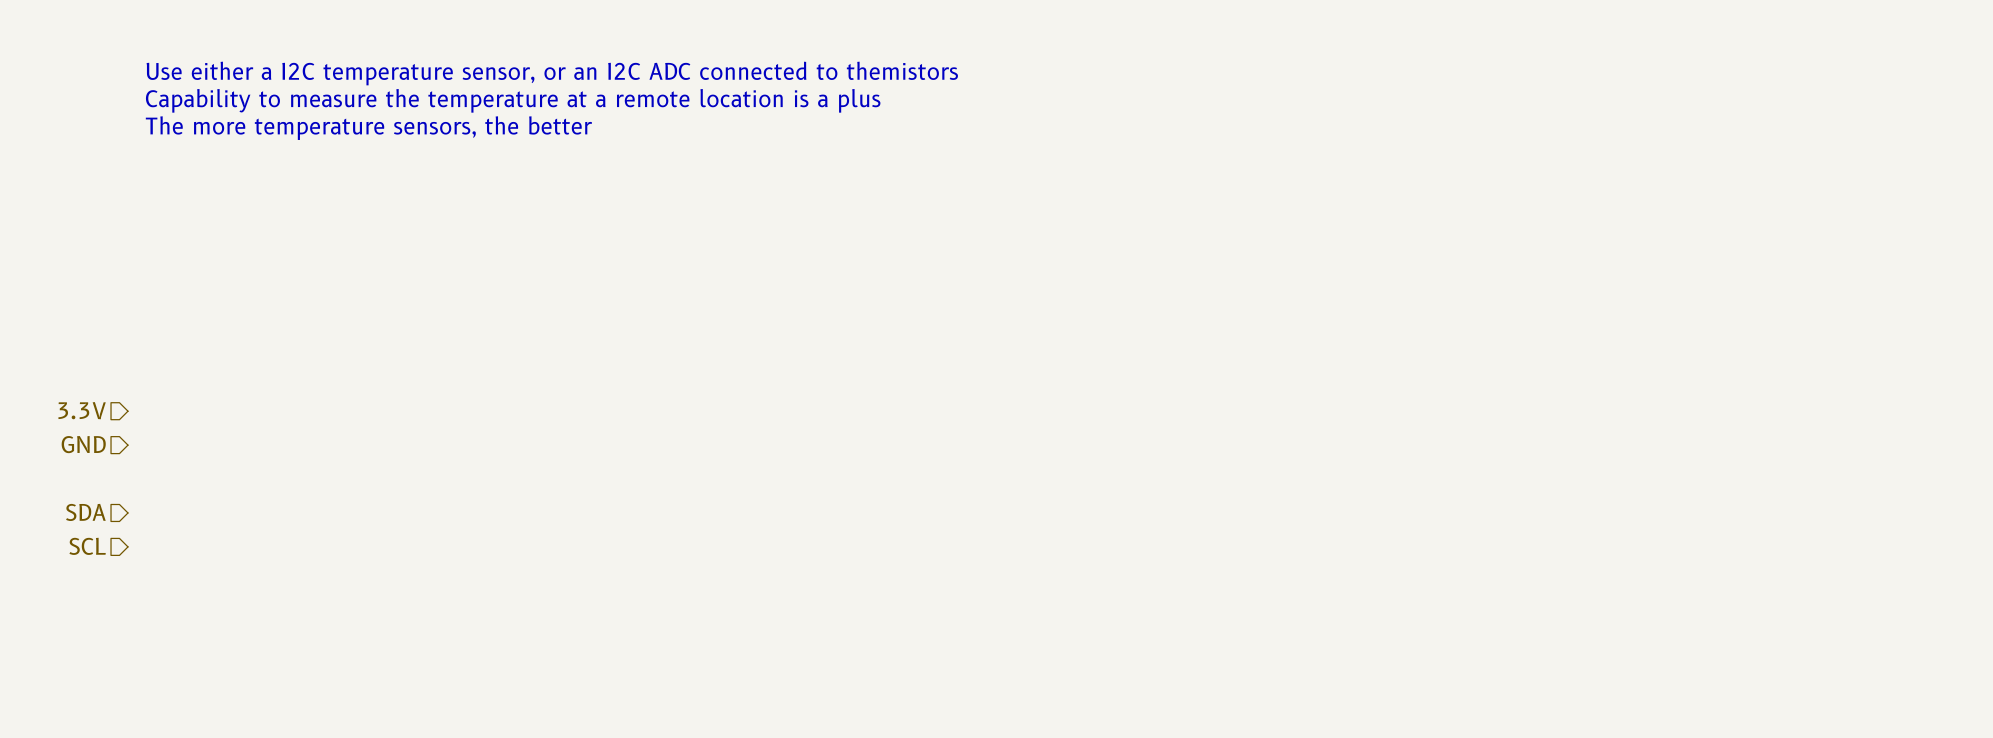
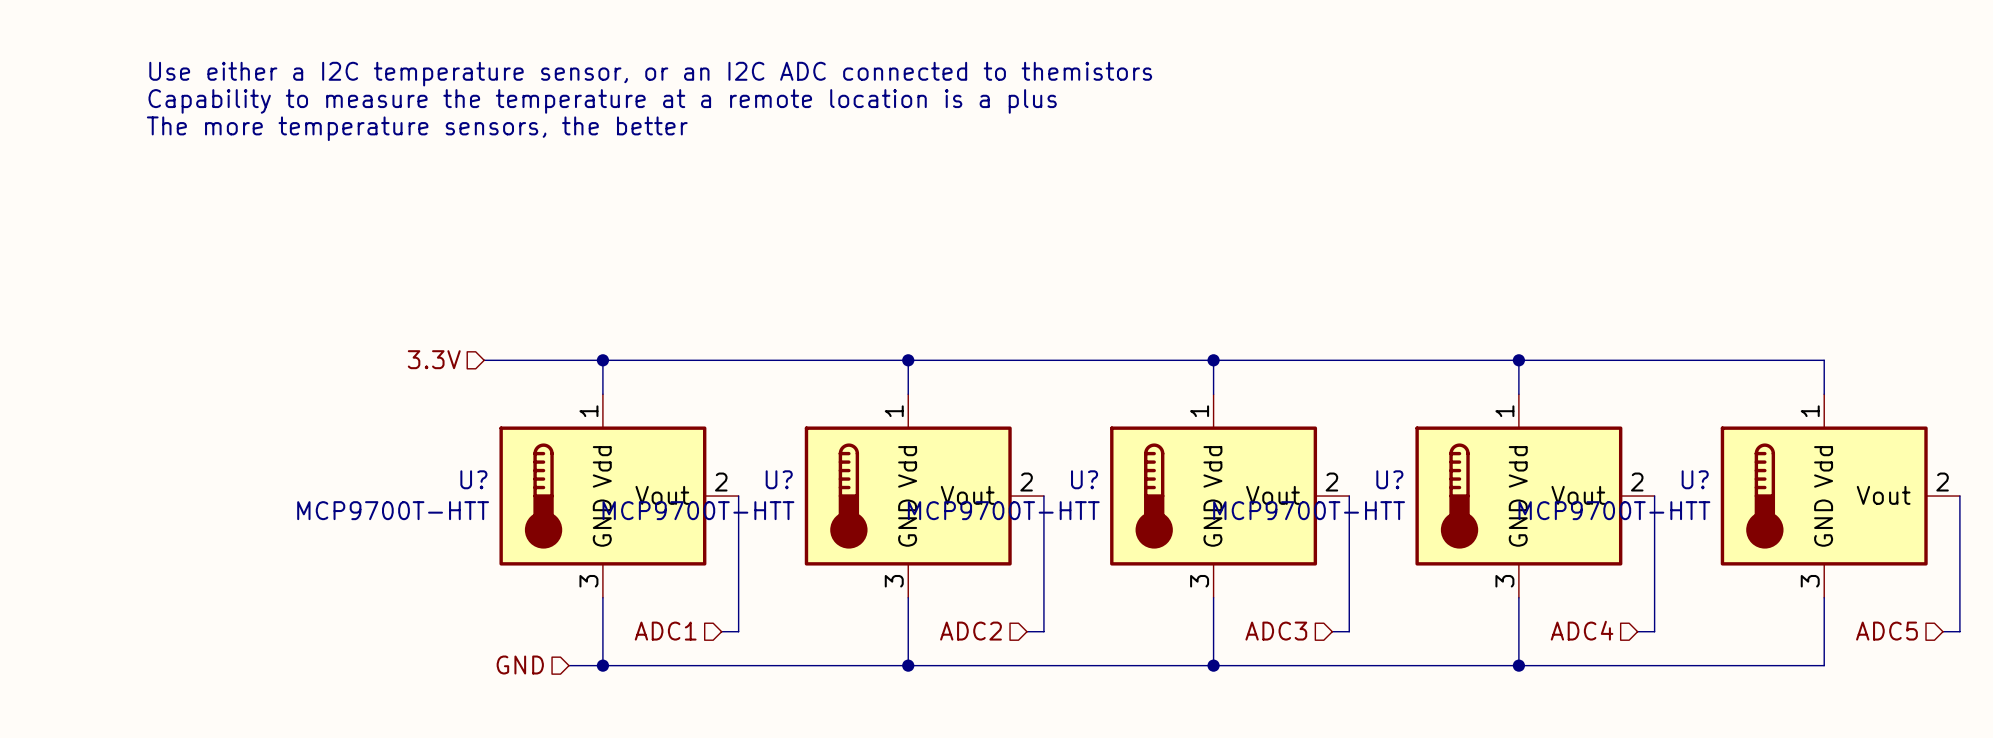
hierarchical label: none -> 3.3V (434, 359)
wire: none -> (484, 360) (1824, 360) (1824, 394)
wire: none -> (602, 360) (602, 394)
junction: none -> (602, 360)
wire: none -> (908, 360) (908, 394)
junction: none -> (908, 360)
wire: none -> (1213, 360) (1213, 394)
junction: none -> (1213, 360)
wire: none -> (1518, 360) (1518, 394)
junction: none -> (1518, 360)
hierarchical label: 3.3V (82, 410) -> none
hierarchical label: GND (83, 444) -> none
U?: none -> MCP9700T-HTT (619, 496)
wire: none -> (738, 496) (738, 631) (721, 631)
U?: none -> MCP9700T-HTT (924, 496)
wire: none -> (1043, 496) (1043, 631) (1026, 631)
U?: none -> MCP9700T-HTT (1229, 496)
wire: none -> (1349, 496) (1349, 631) (1332, 631)
U?: none -> MCP9700T-HTT (1535, 496)
wire: none -> (1654, 496) (1654, 631) (1637, 631)
U?: none -> MCP9700T-HTT (1840, 496)
wire: none -> (1959, 496) (1959, 631) (1942, 631)
hierarchical label: SDA (85, 512) -> none
hierarchical label: SCL (87, 546) -> none
wire: none -> (602, 597) (602, 665)
wire: none -> (908, 597) (908, 665)
wire: none -> (1213, 597) (1213, 665)
wire: none -> (1518, 597) (1518, 665)
wire: none -> (1824, 597) (1824, 665) (569, 665)
hierarchical label: none -> ADC1 (665, 631)
hierarchical label: none -> ADC2 (970, 631)
hierarchical label: none -> ADC3 (1276, 631)
hierarchical label: none -> ADC4 (1582, 630)
hierarchical label: none -> ADC5 (1886, 631)
hierarchical label: none -> GND (520, 665)
junction: none -> (602, 665)
junction: none -> (908, 665)
junction: none -> (1213, 665)
junction: none -> (1518, 665)

